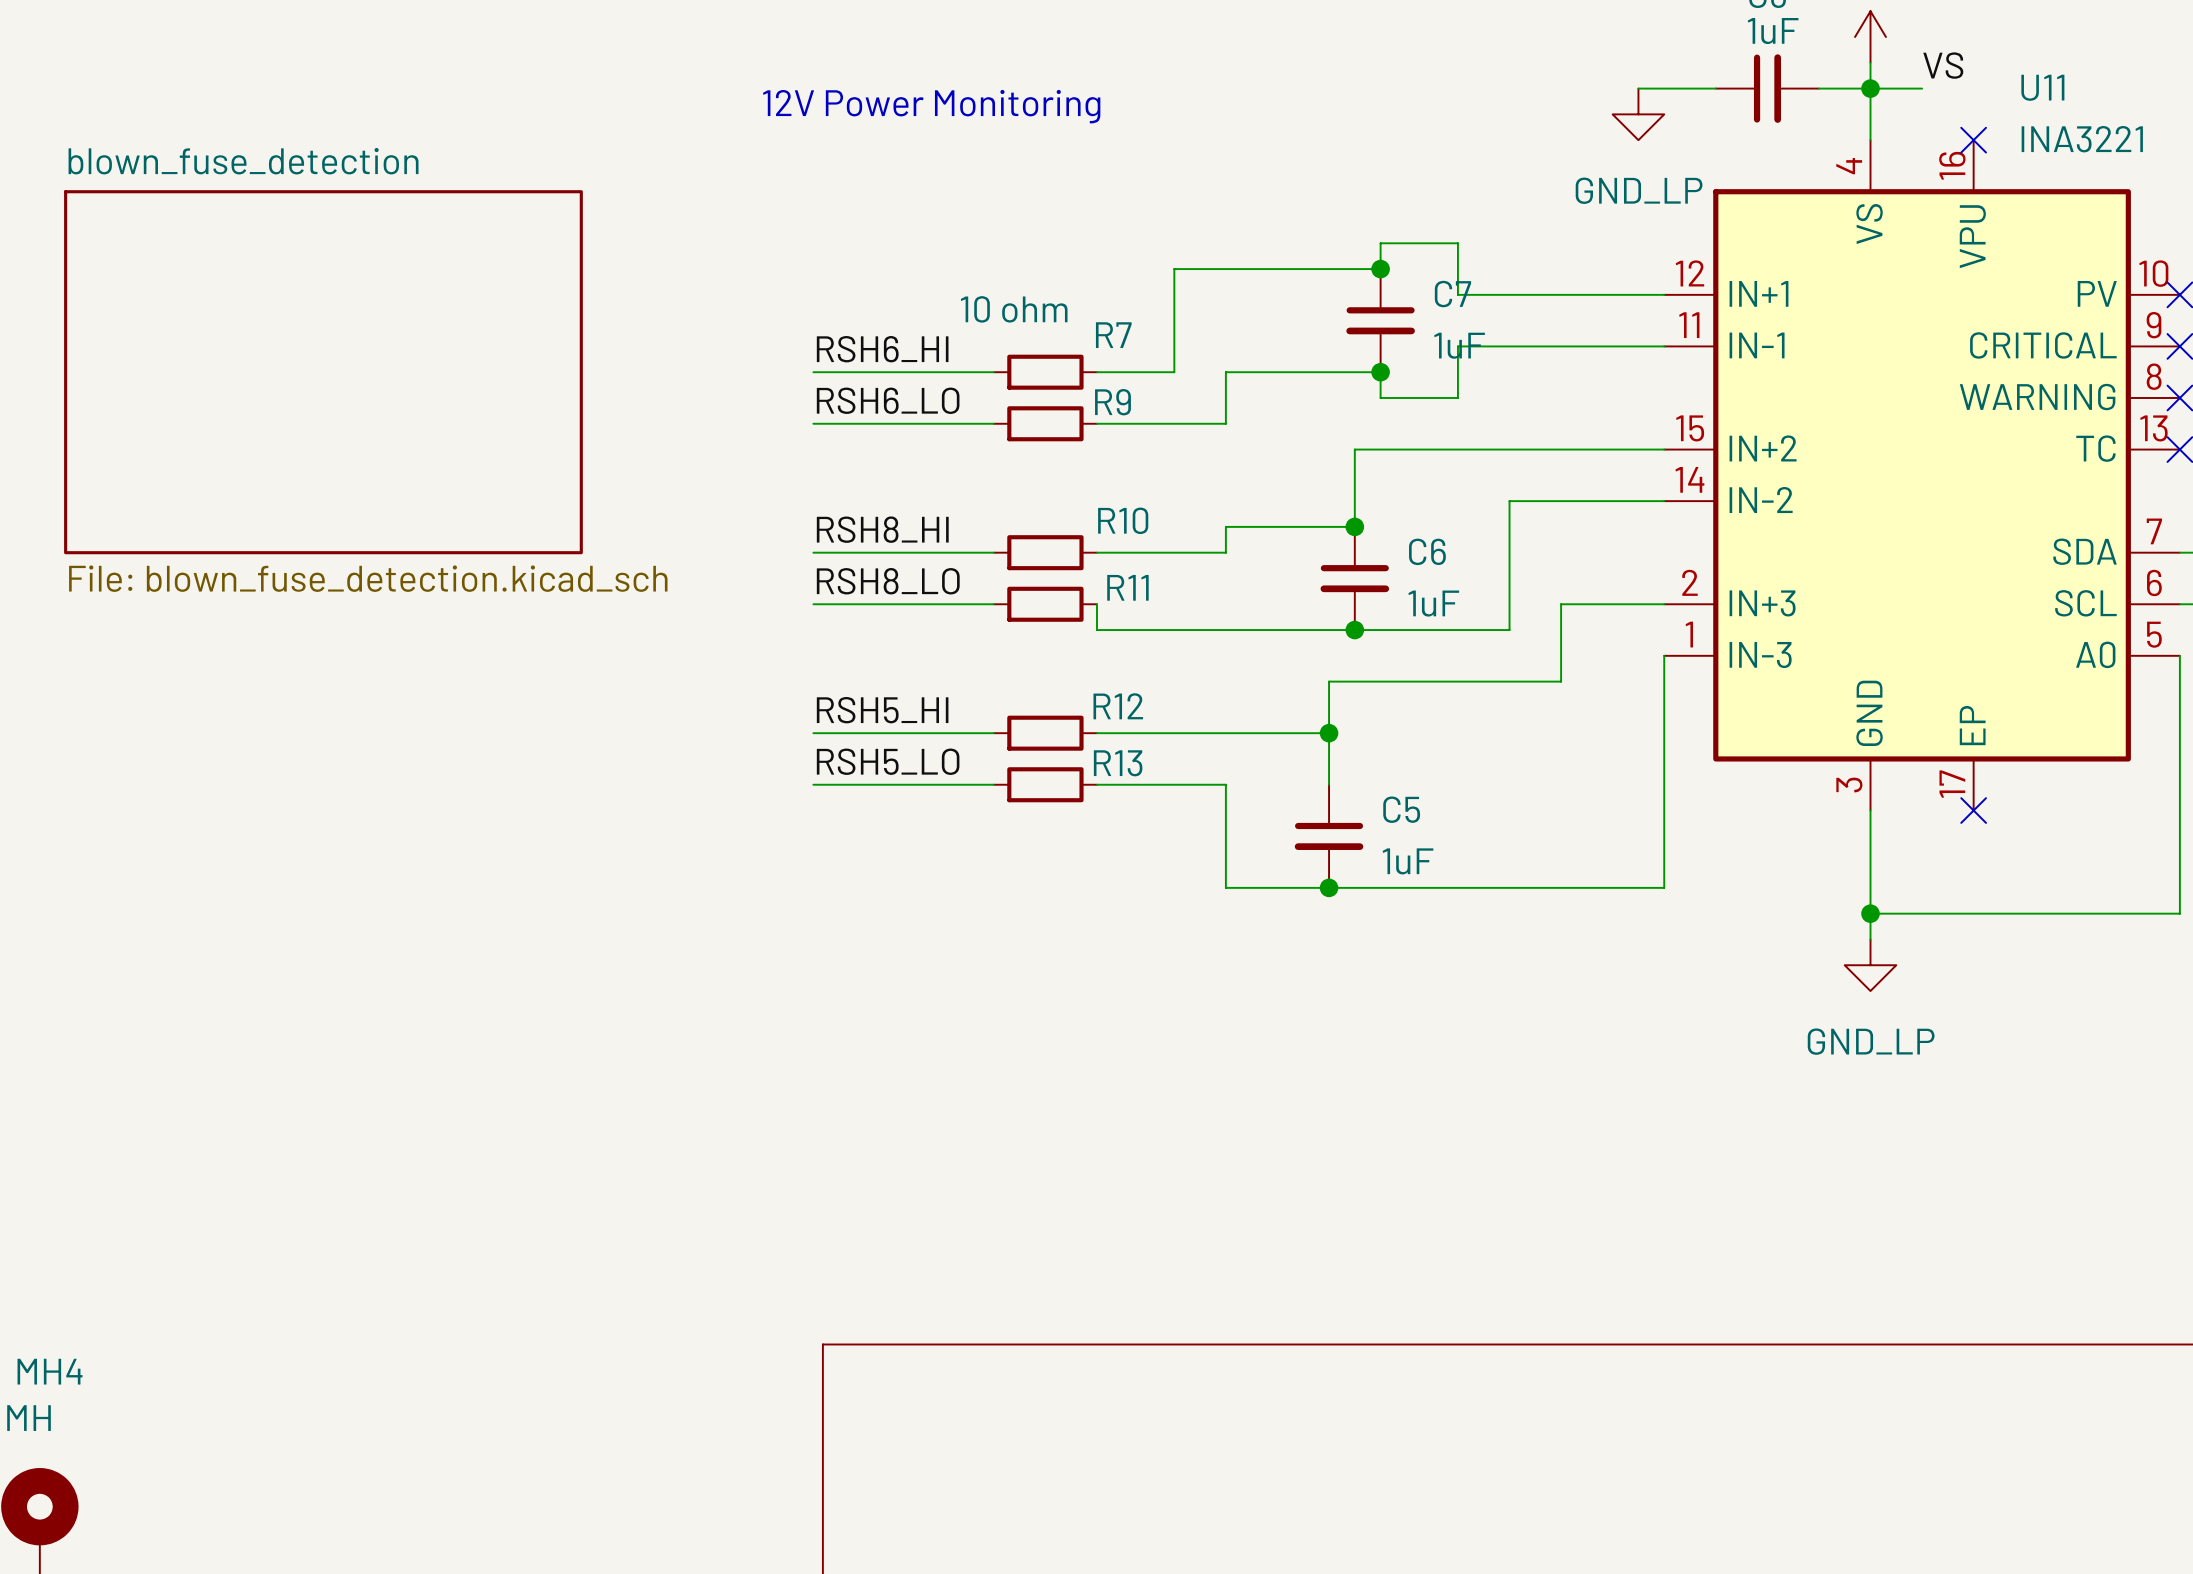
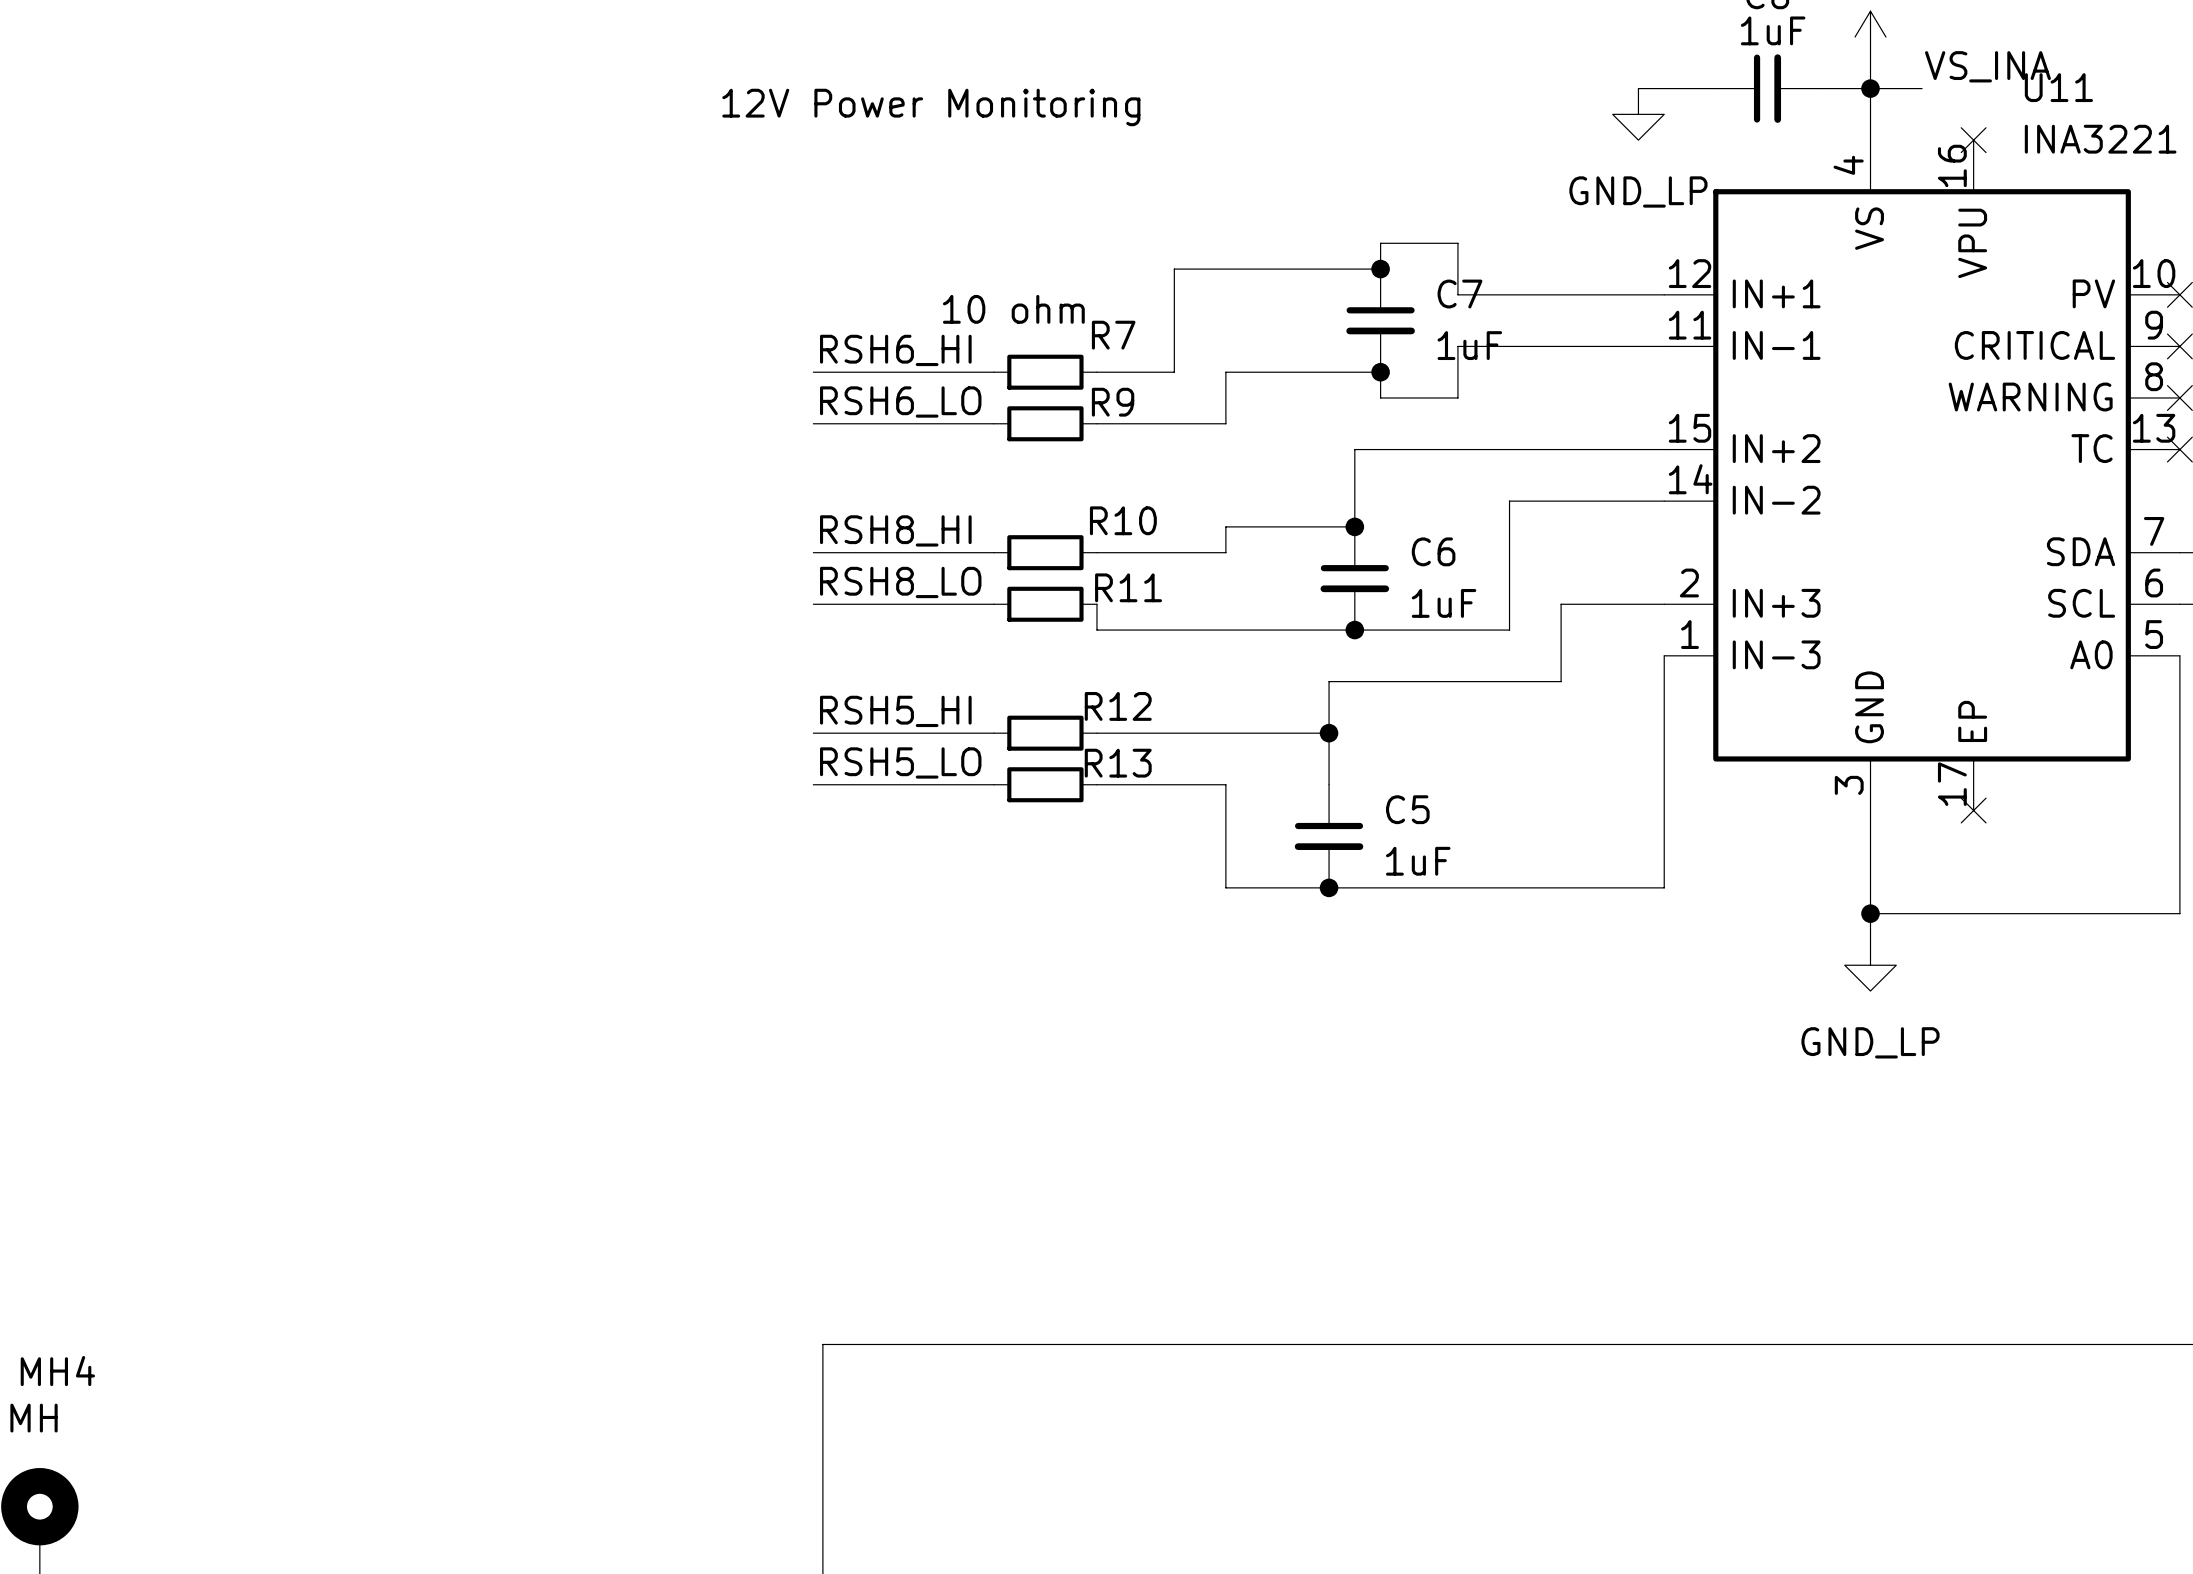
label: VS (1943, 65) -> VS_INA (1987, 66)
sheet blown_fuse_detection: File: blown_fuse_detection.kicad_sch (323, 372) -> none

